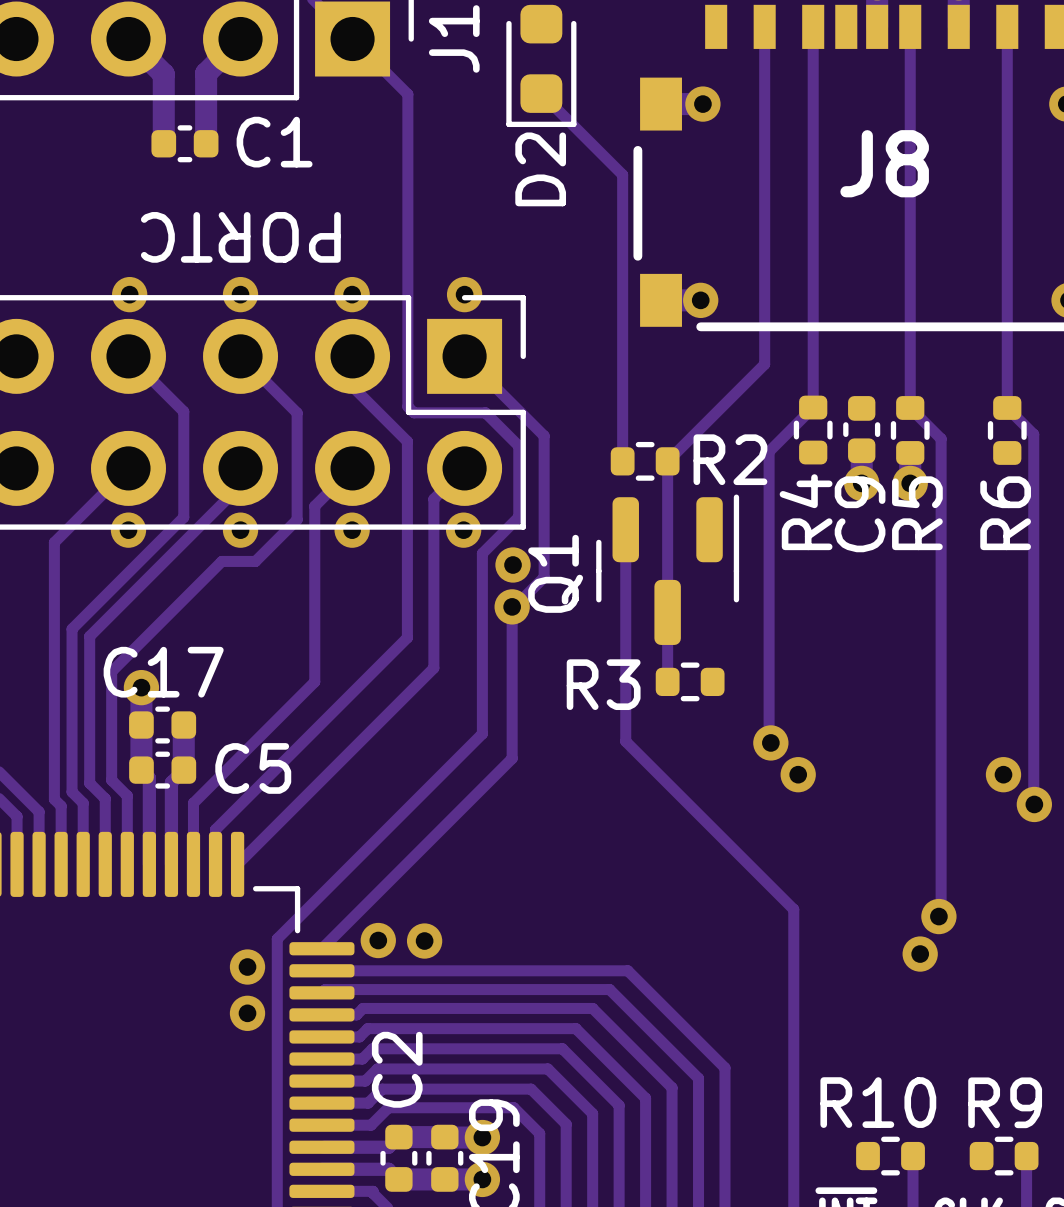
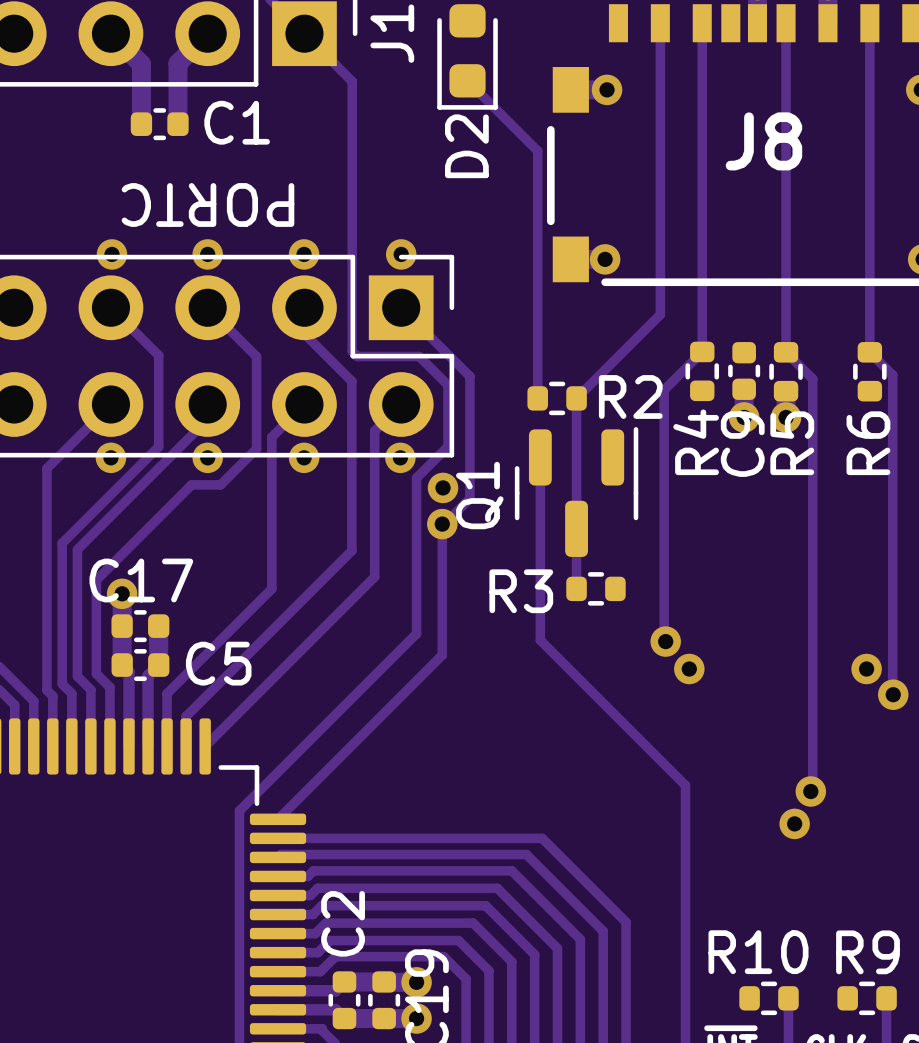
via: (378, 940) -> none
via: (424, 941) -> none
via: (247, 967) -> none
via: (247, 1013) -> none

